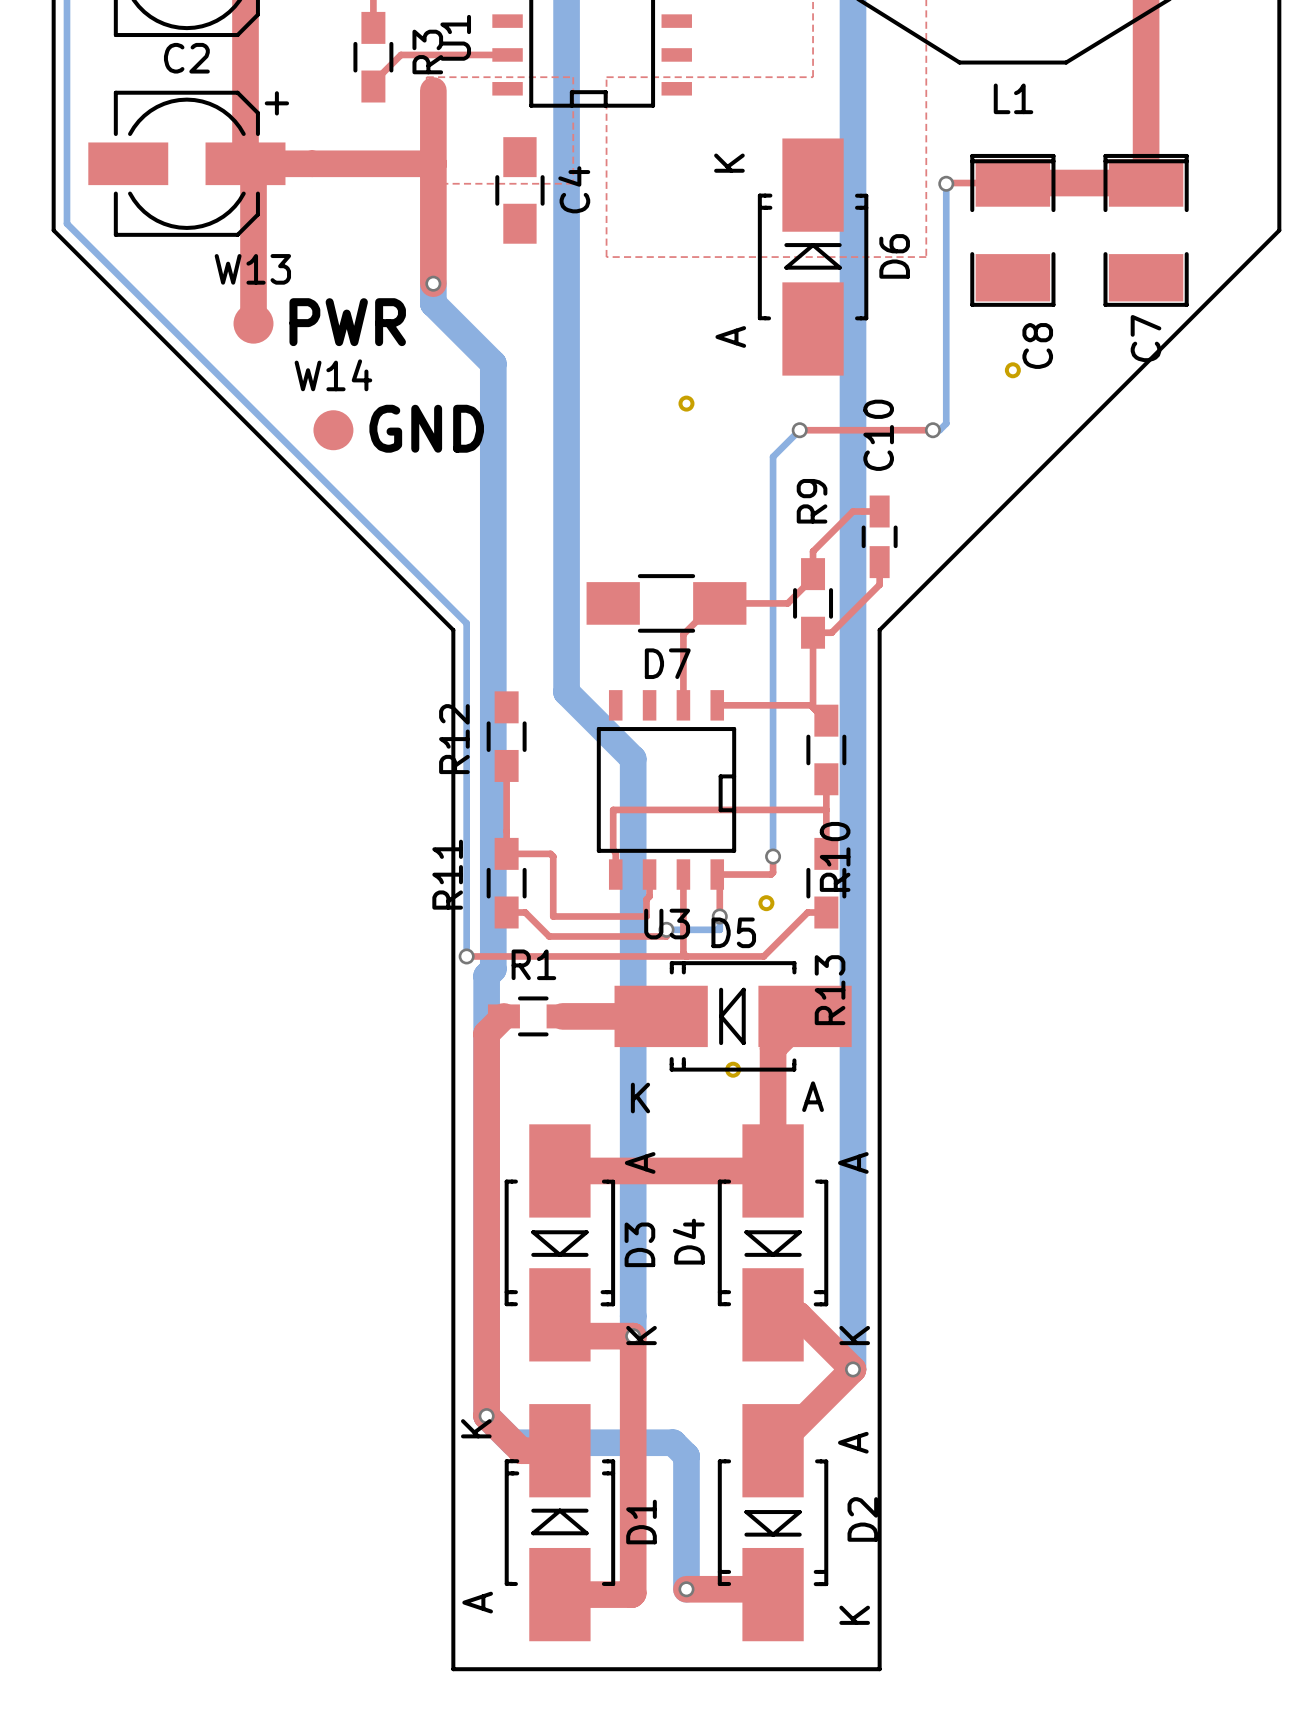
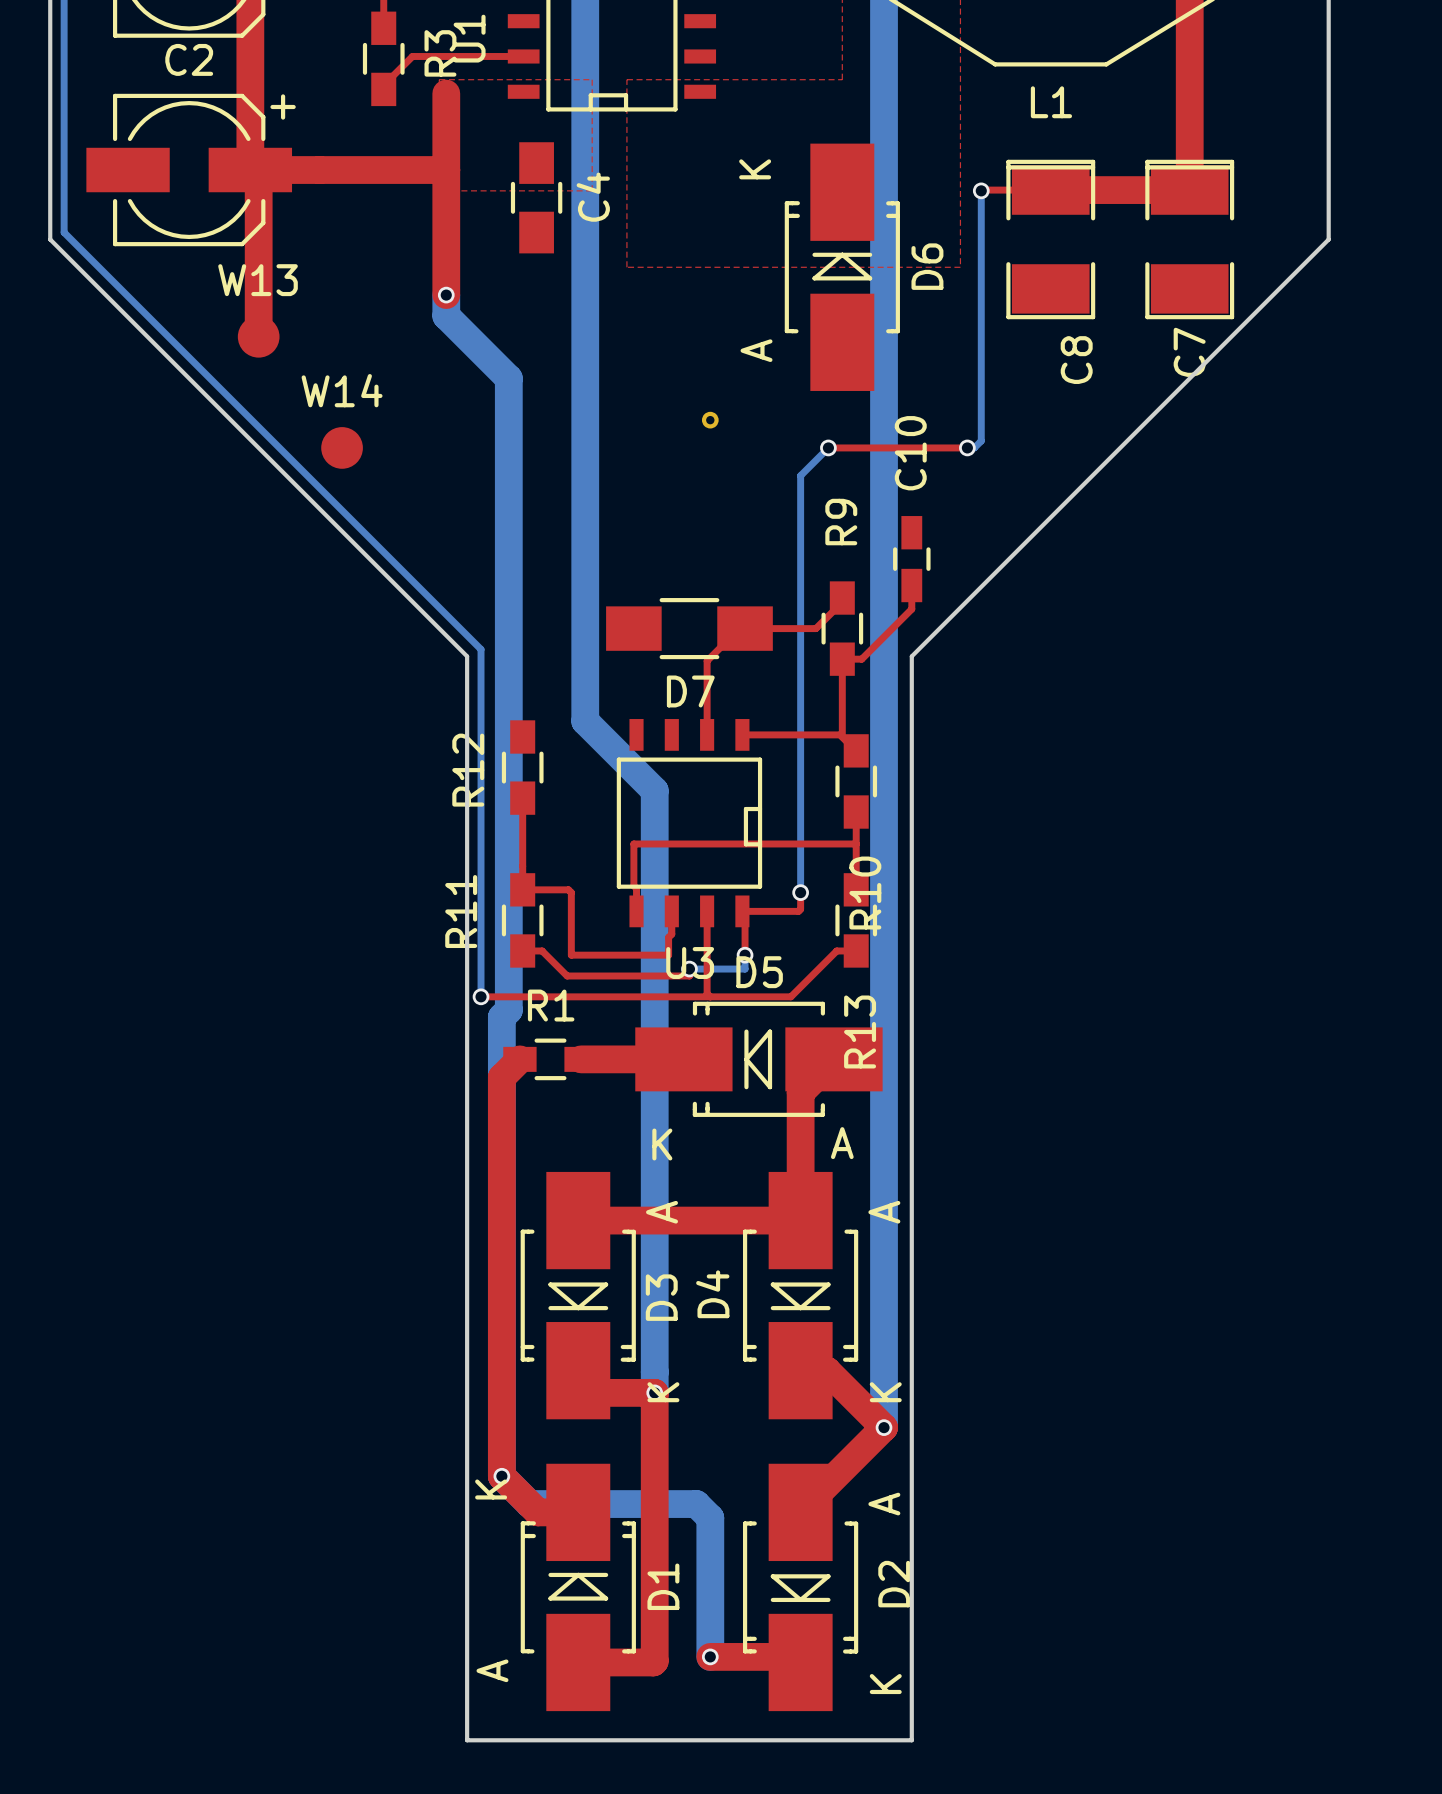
text: PWR (347, 322) -> none
part: (1012, 370) -> none
text: GND (426, 428) -> none
top track: (879, 511) (853, 511) (813, 551) (813, 574) -> none
part: (766, 903) -> none
part: (733, 1069) -> none

